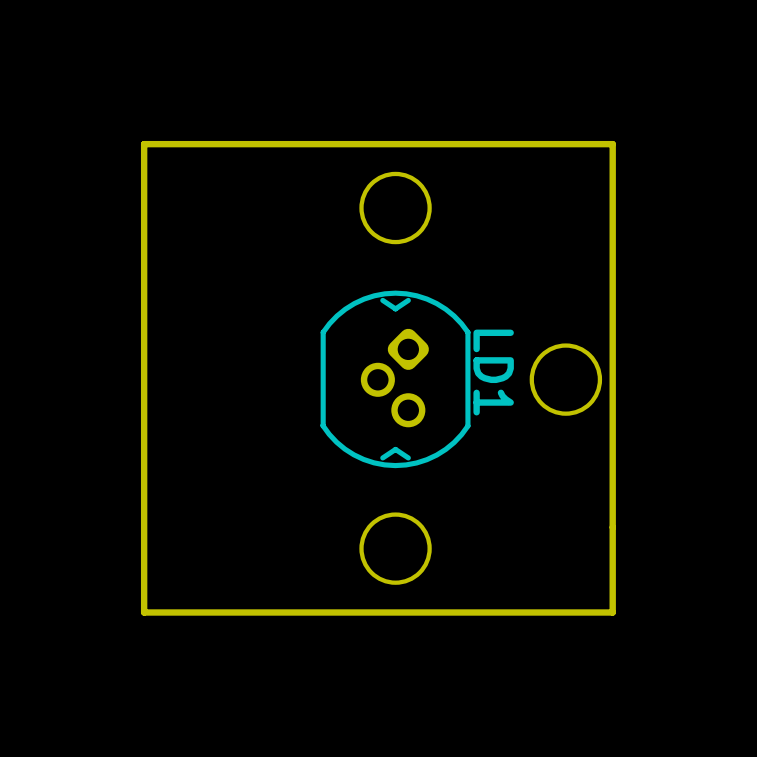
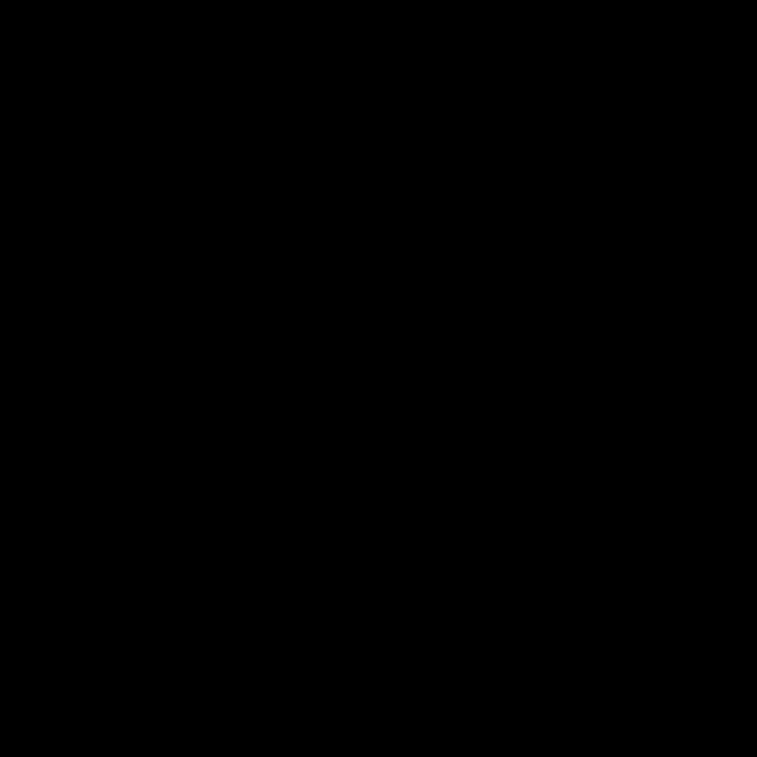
board edge: (612, 144) (612, 612) (144, 612) (144, 144) (612, 144) -> none
round board edge: [359, 171, 432, 245] -> none
round board edge: [529, 343, 603, 416] -> none
LD1: (395, 379) -> none
round board edge: [359, 512, 432, 585] -> none

